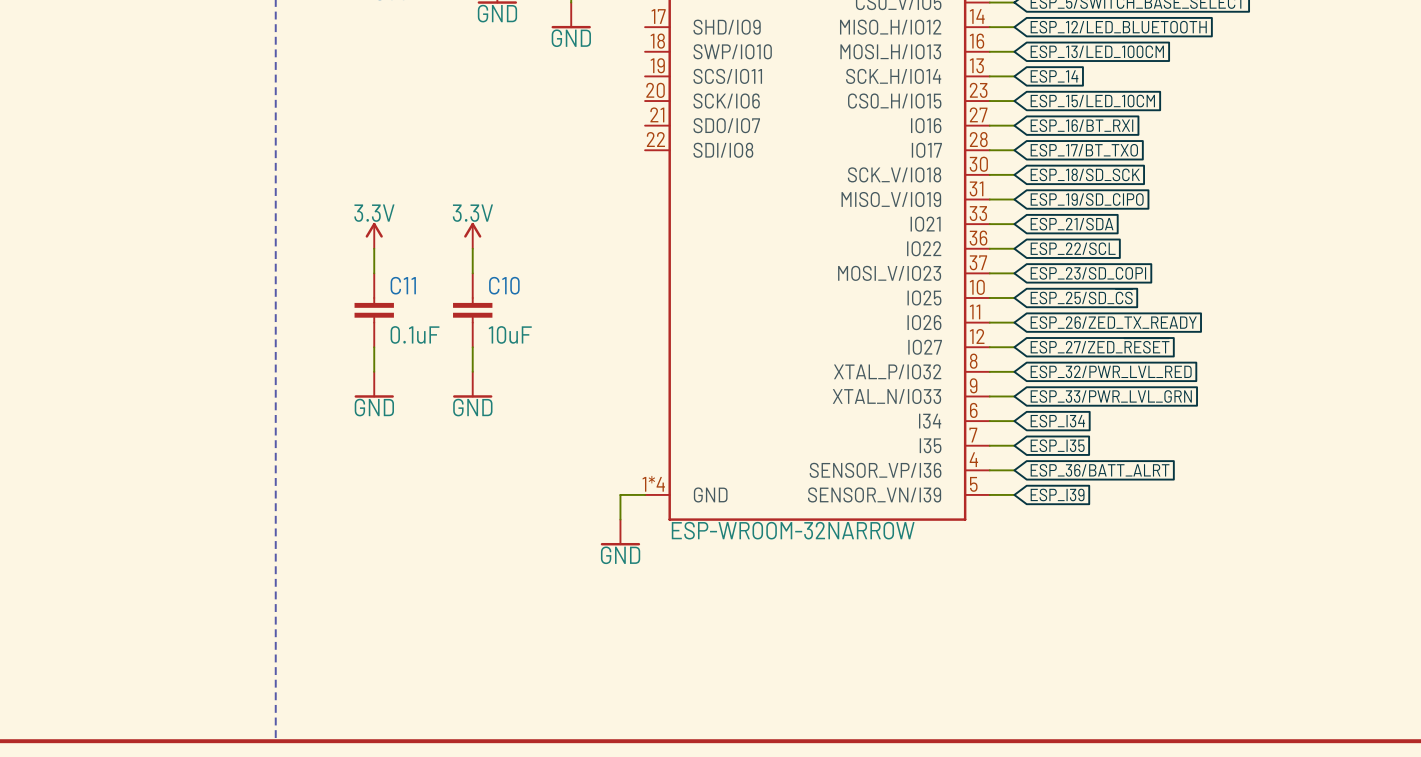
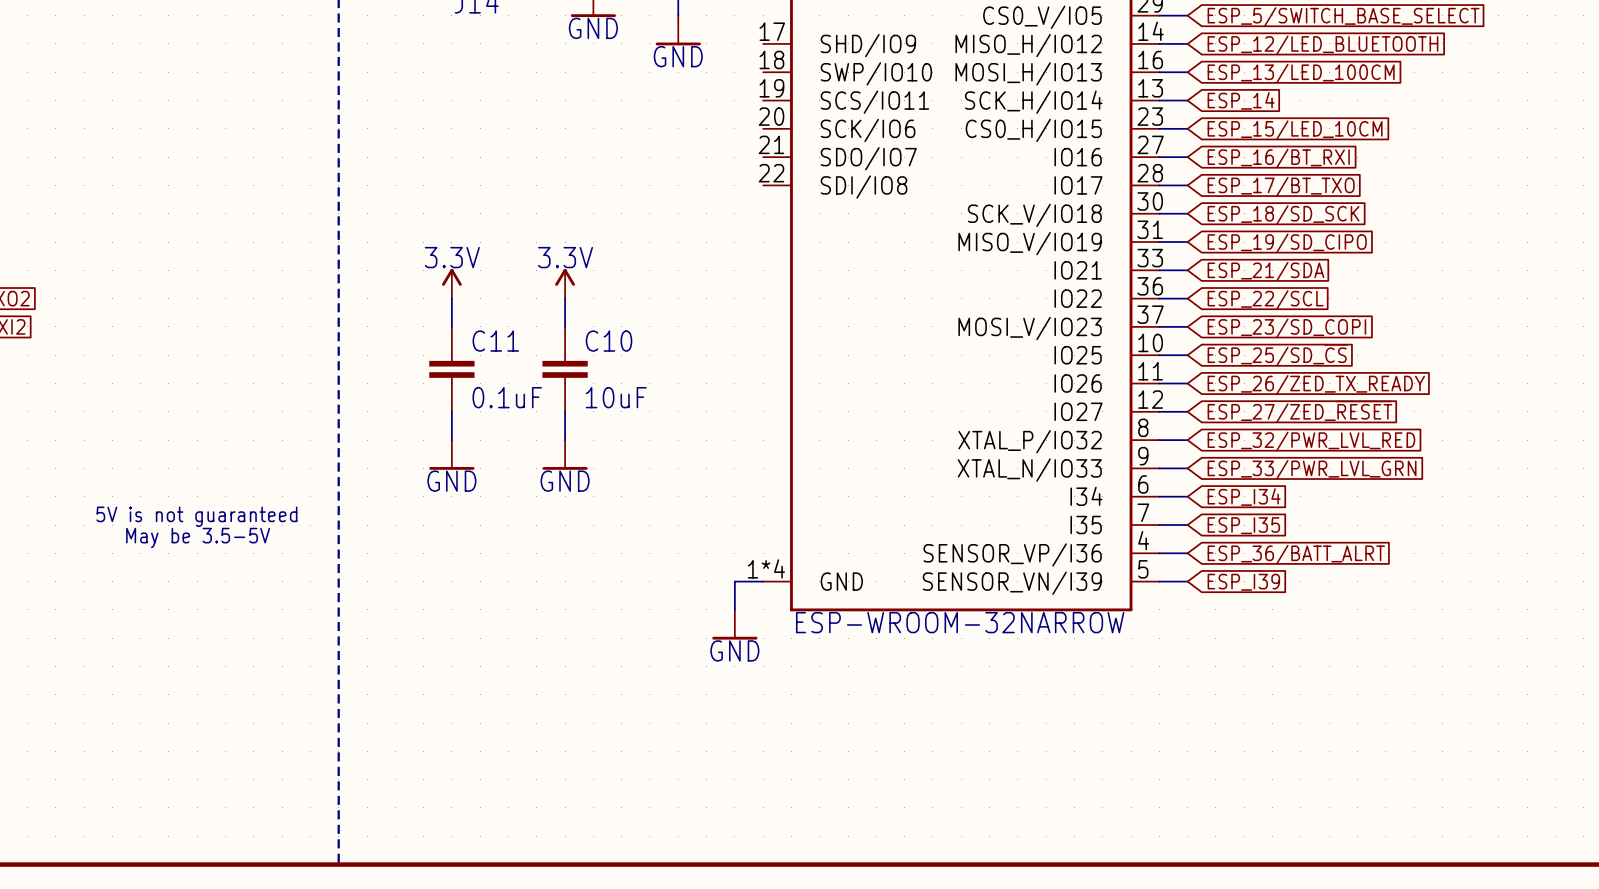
text: none -> 5V is not guaranteed (196, 516)
text: none -> May be 3.5-5V (198, 537)

